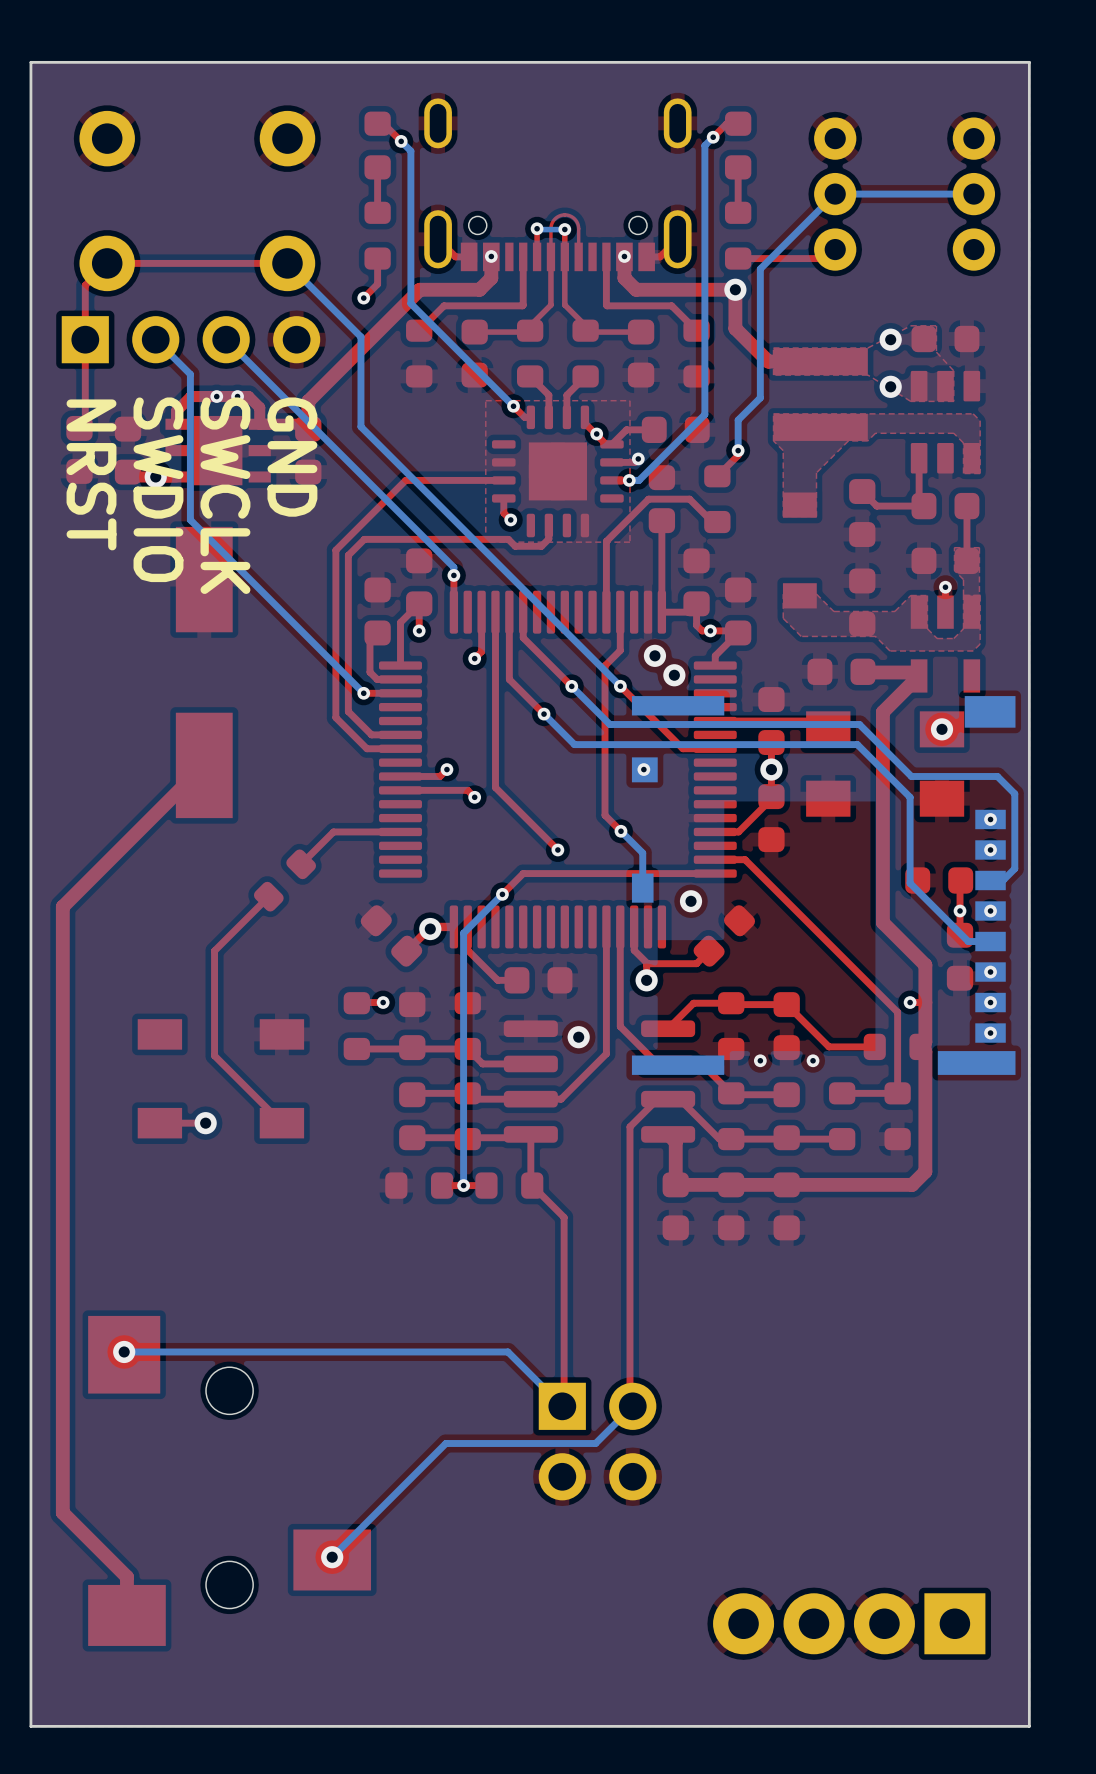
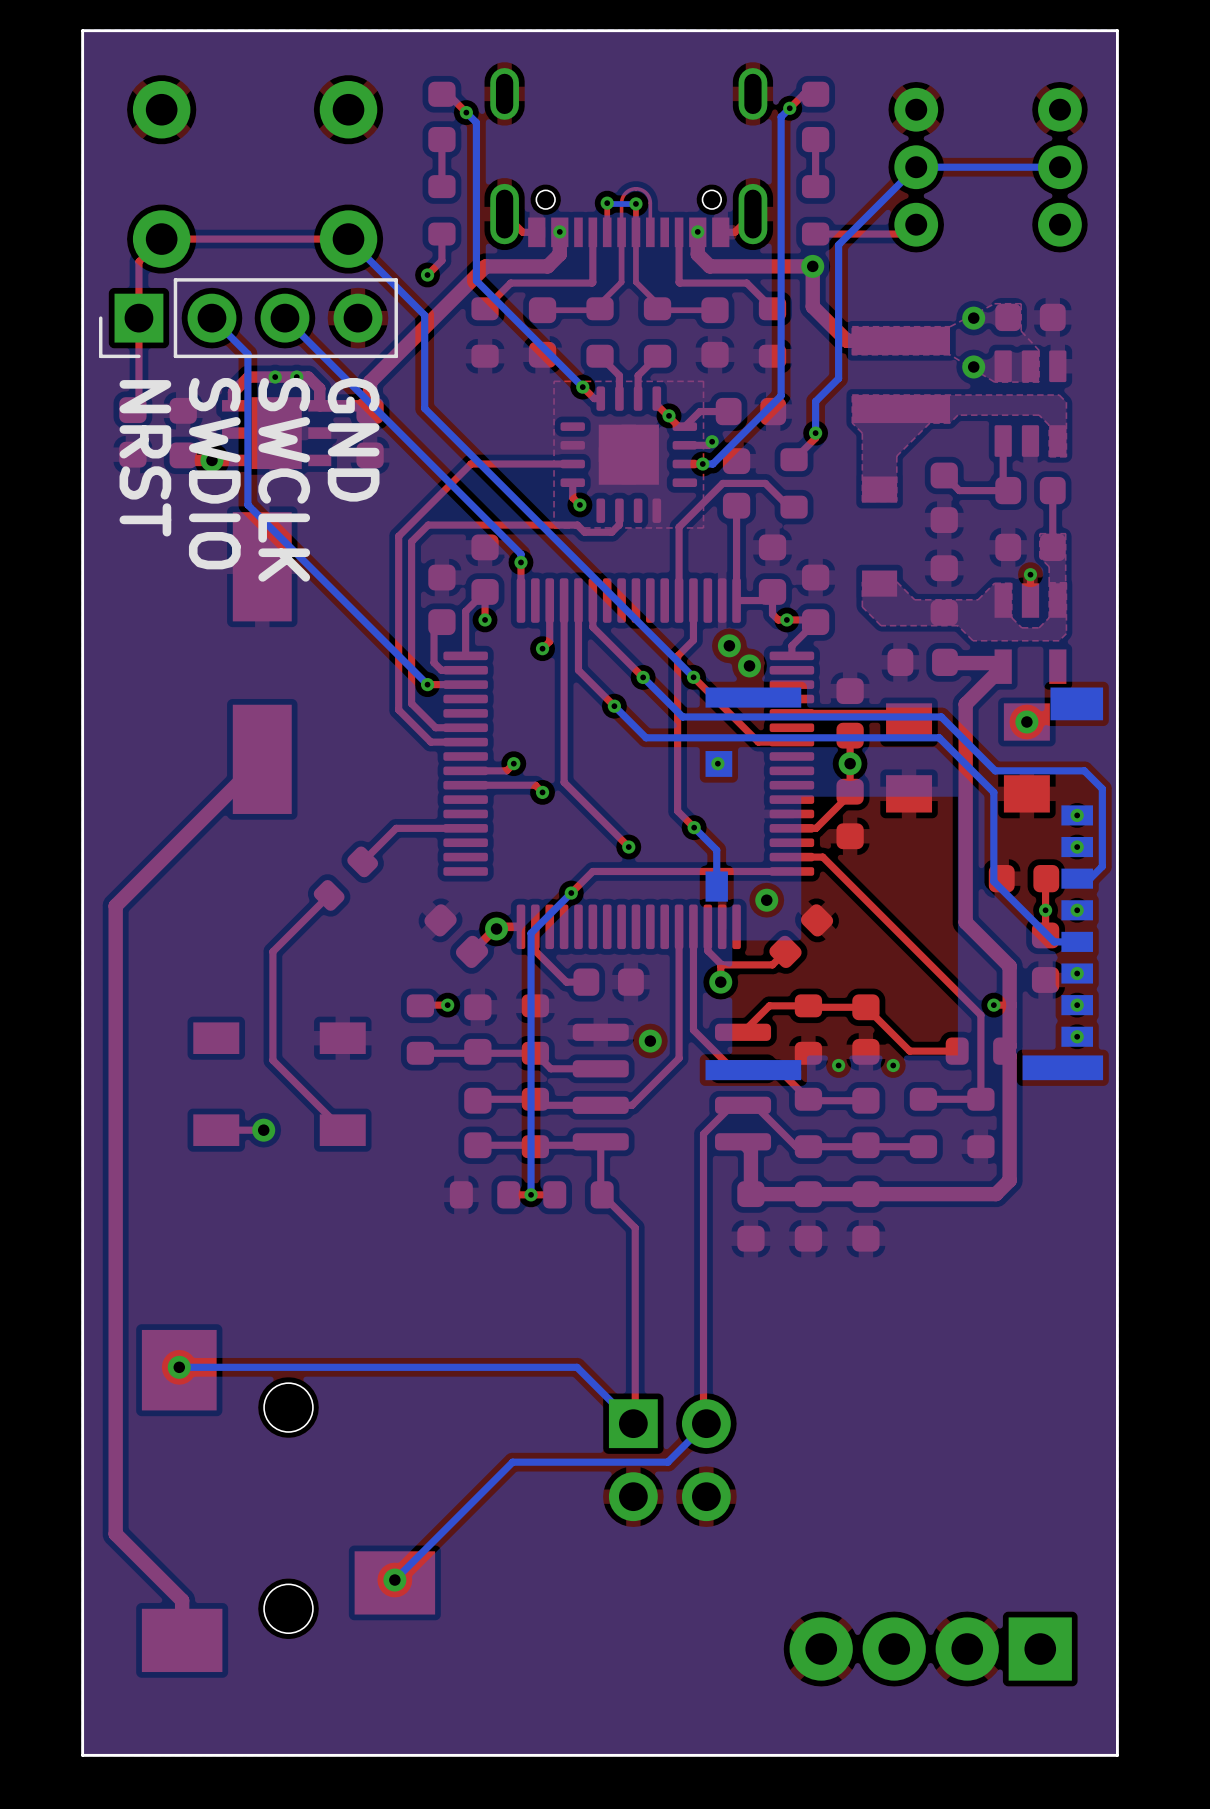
part side: top (190, 339) -> bottom (248, 318)

